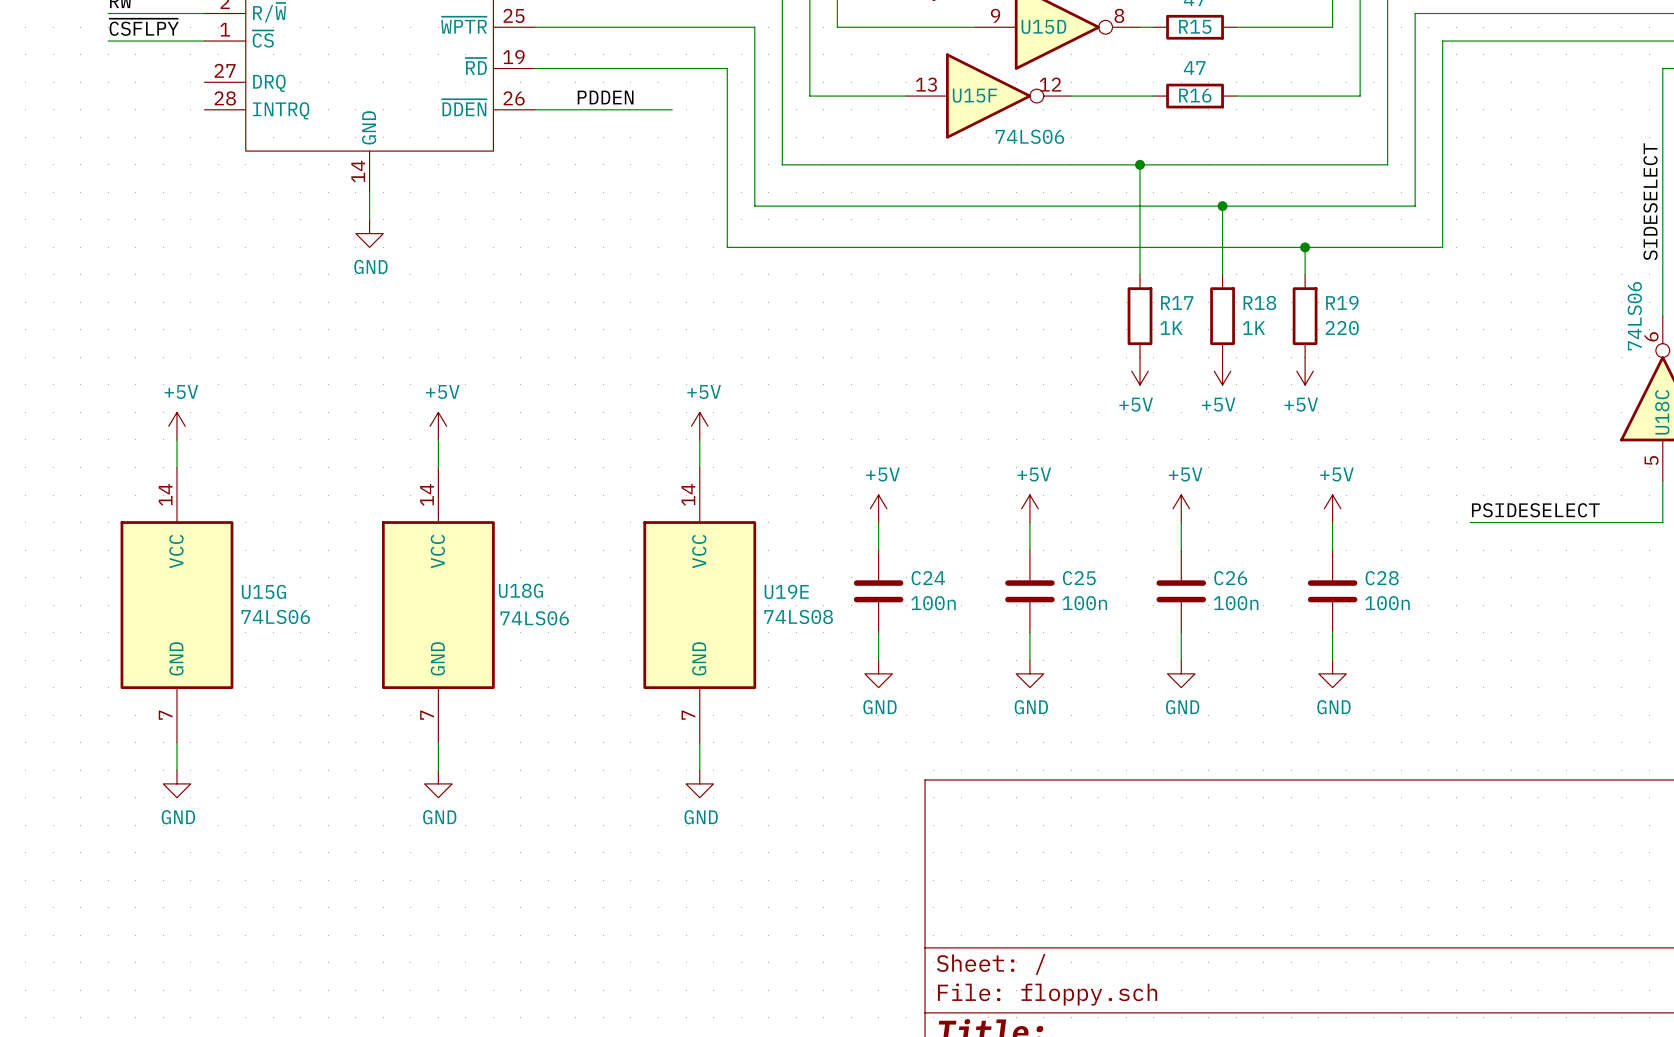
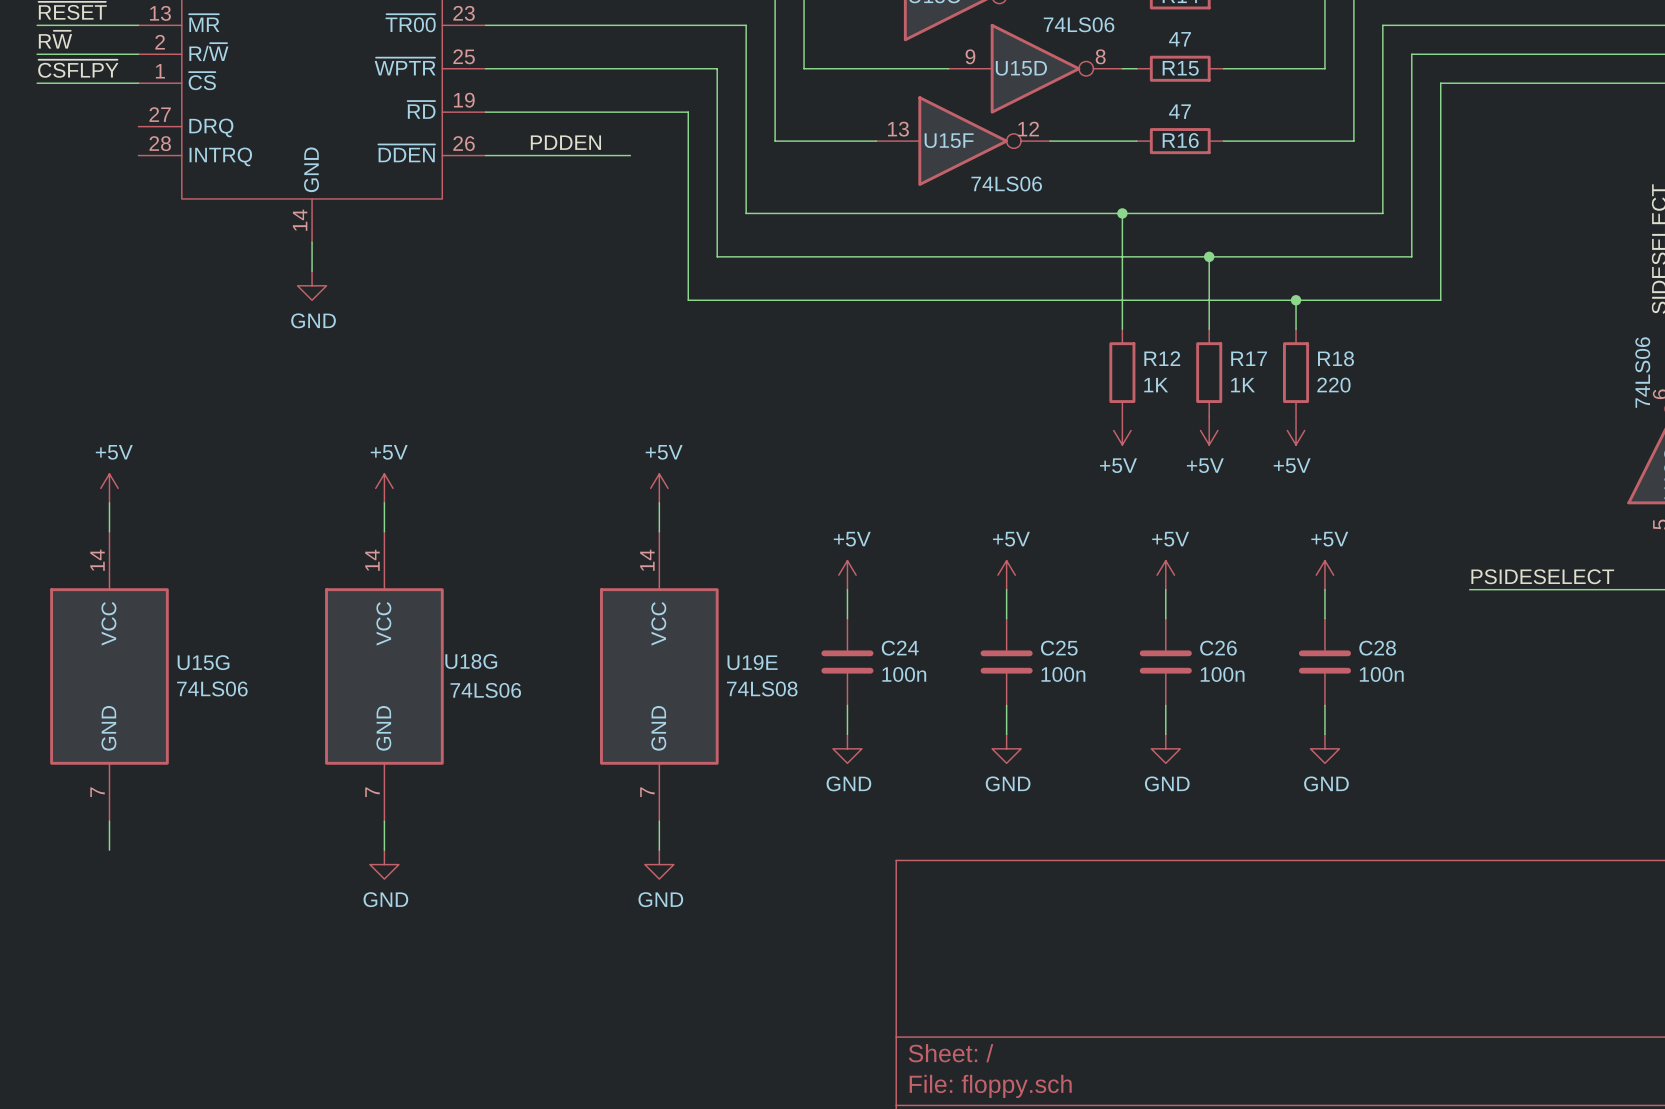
R19 name: R19 (1342, 302) -> R18 (1335, 358)
R17 name: R17 (1177, 303) -> R12 (1162, 358)
R18 name: R18 (1259, 303) -> R17 (1249, 358)
power symbol: GND (176, 783) -> none

